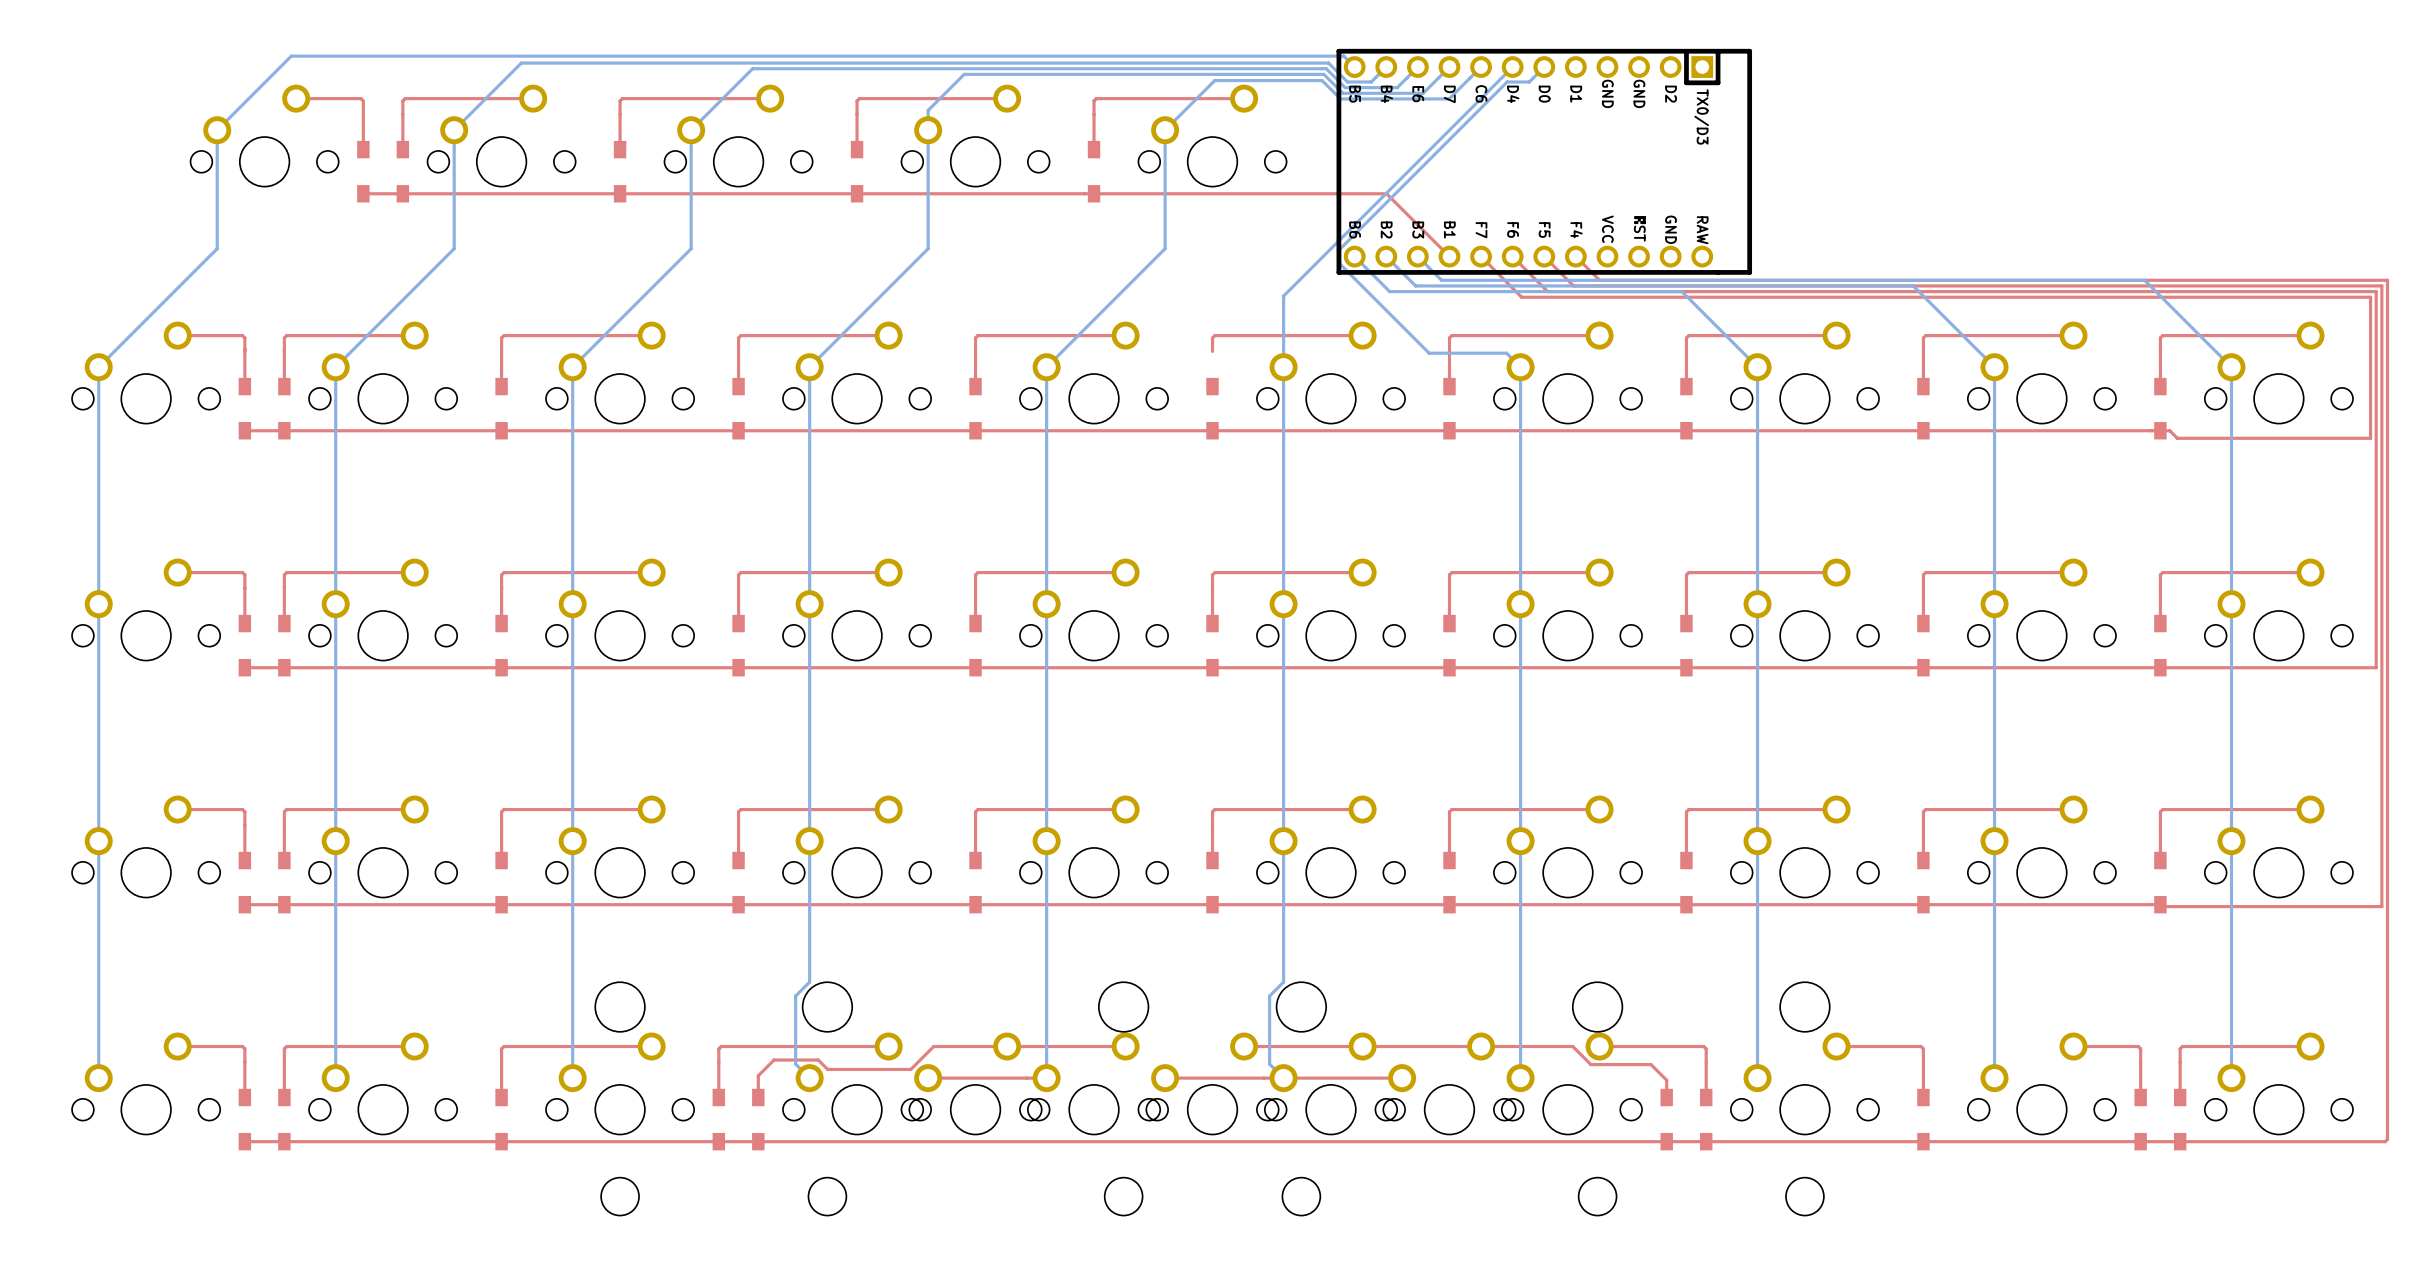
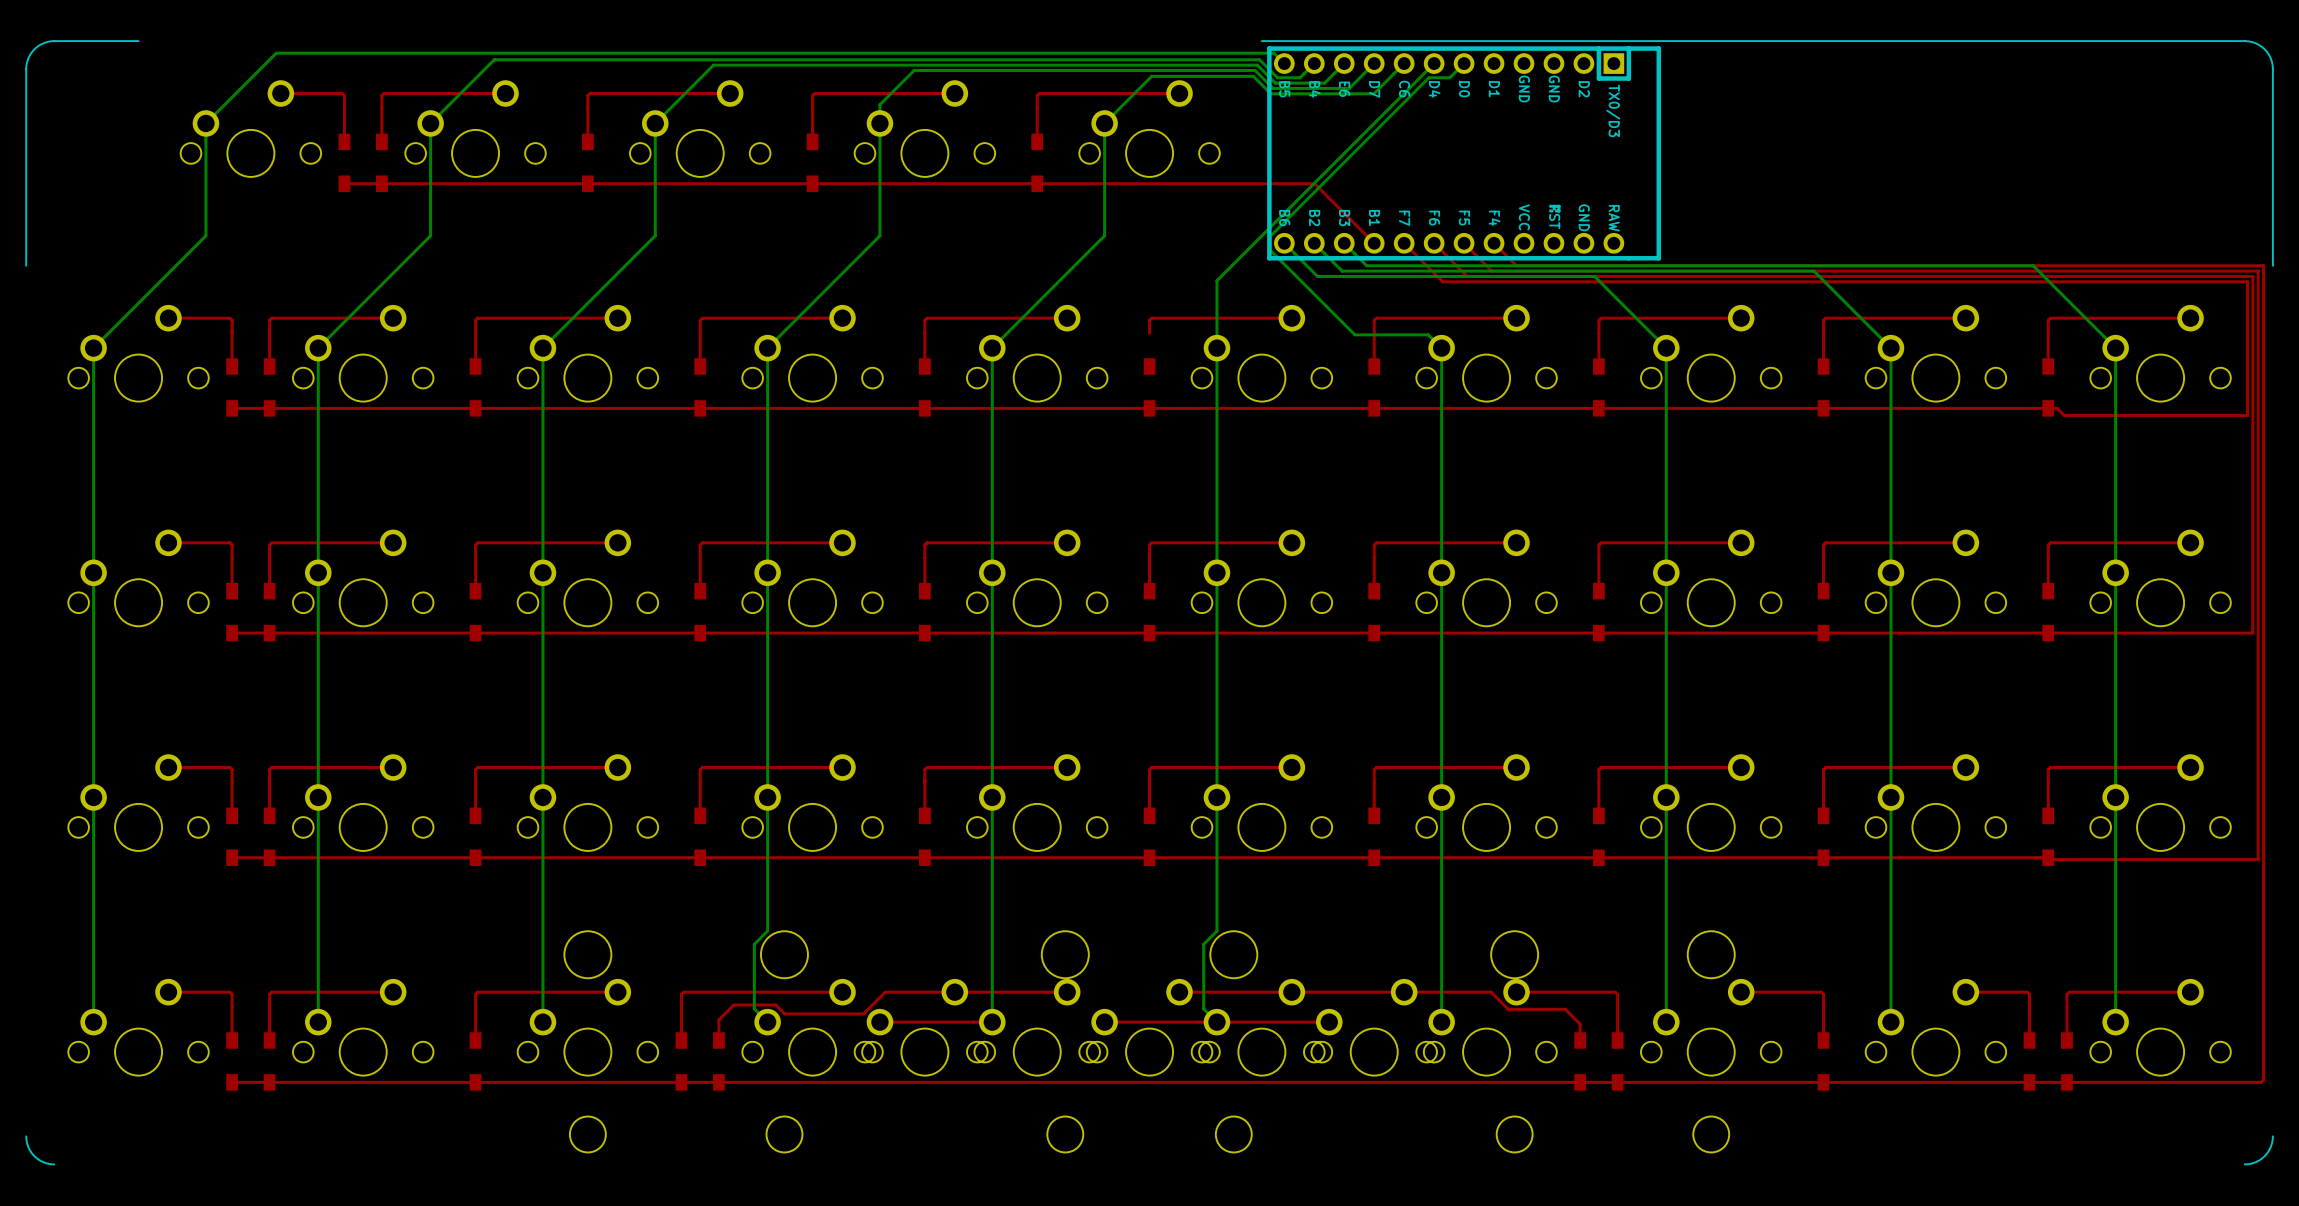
line: none -> (54, 41) (37, 46) (29, 55) (26, 65) (26, 265)
line: none -> (138, 41) (54, 41)
line: none -> (1261, 41) (2252, 42) (2267, 52) (2272, 65) (2272, 265)
line: none -> (26, 1136) (28, 1147) (34, 1156) (43, 1162) (54, 1164)
line: none -> (2272, 1136) (2270, 1147) (2264, 1156) (2255, 1162) (2244, 1164)

